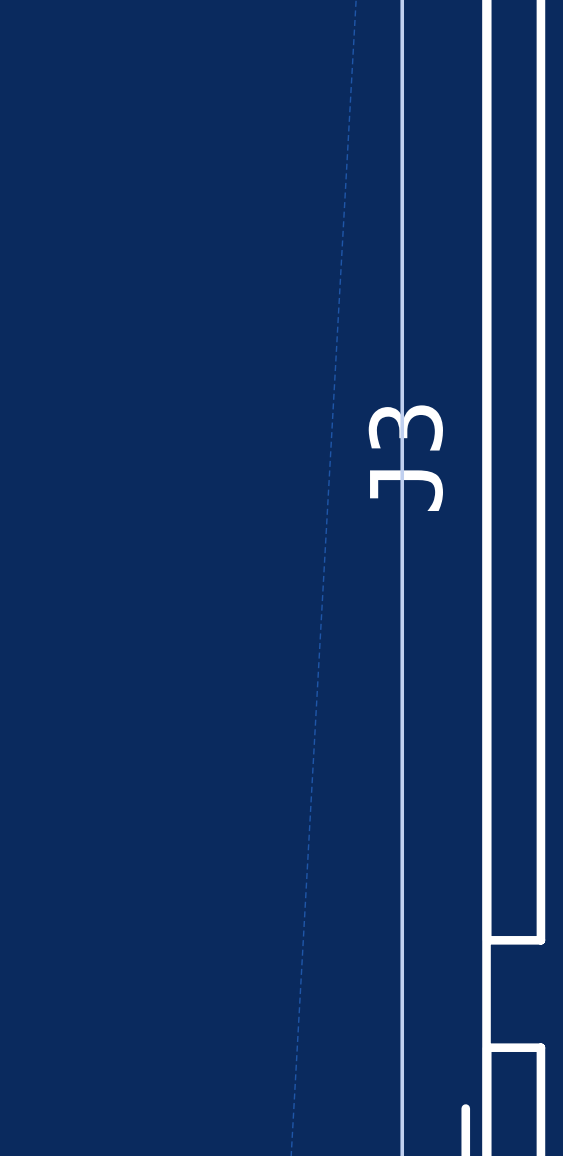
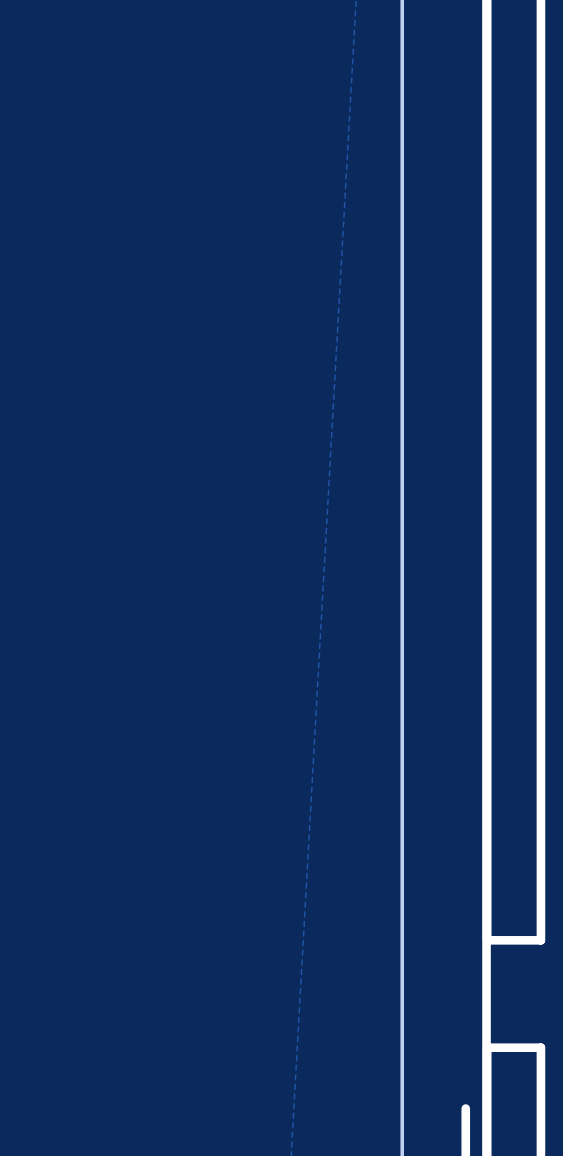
J3 name: J3 (405, 458) -> none

